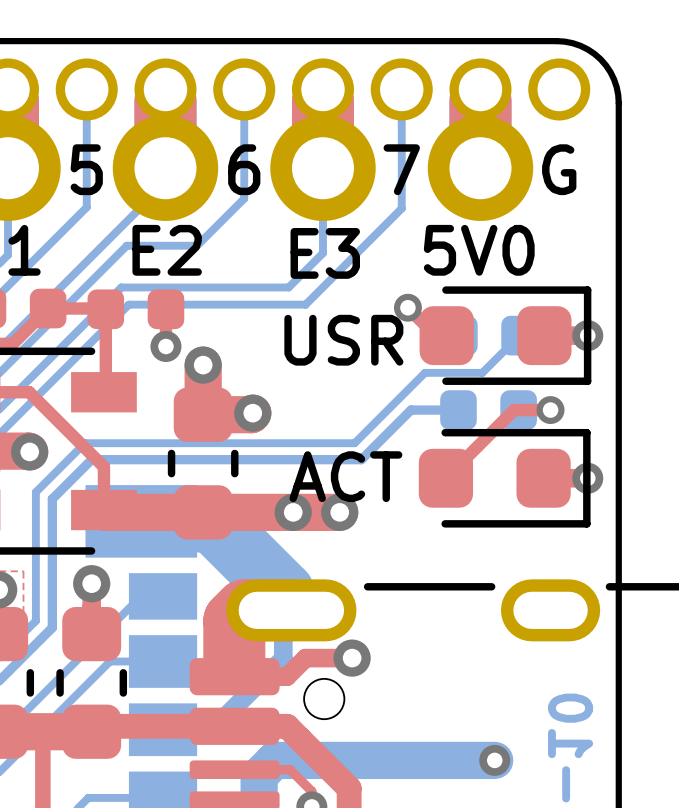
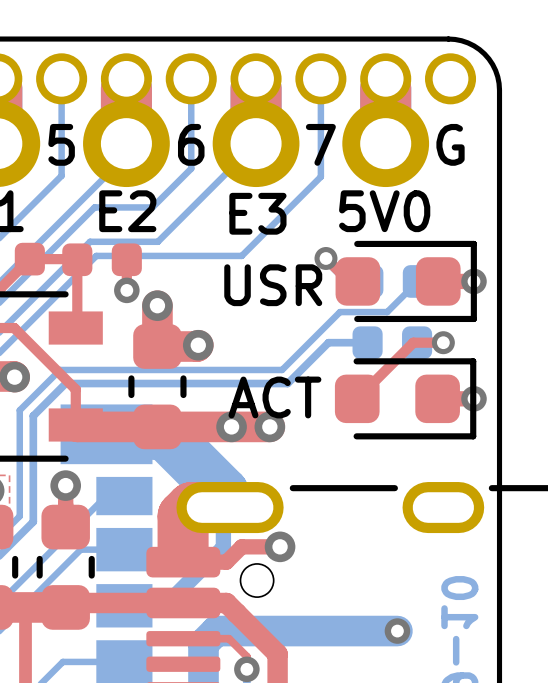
bottom track: (322, 168) (322, 253) (288, 287) (203, 287) -> (256, 143) (157, 241)

